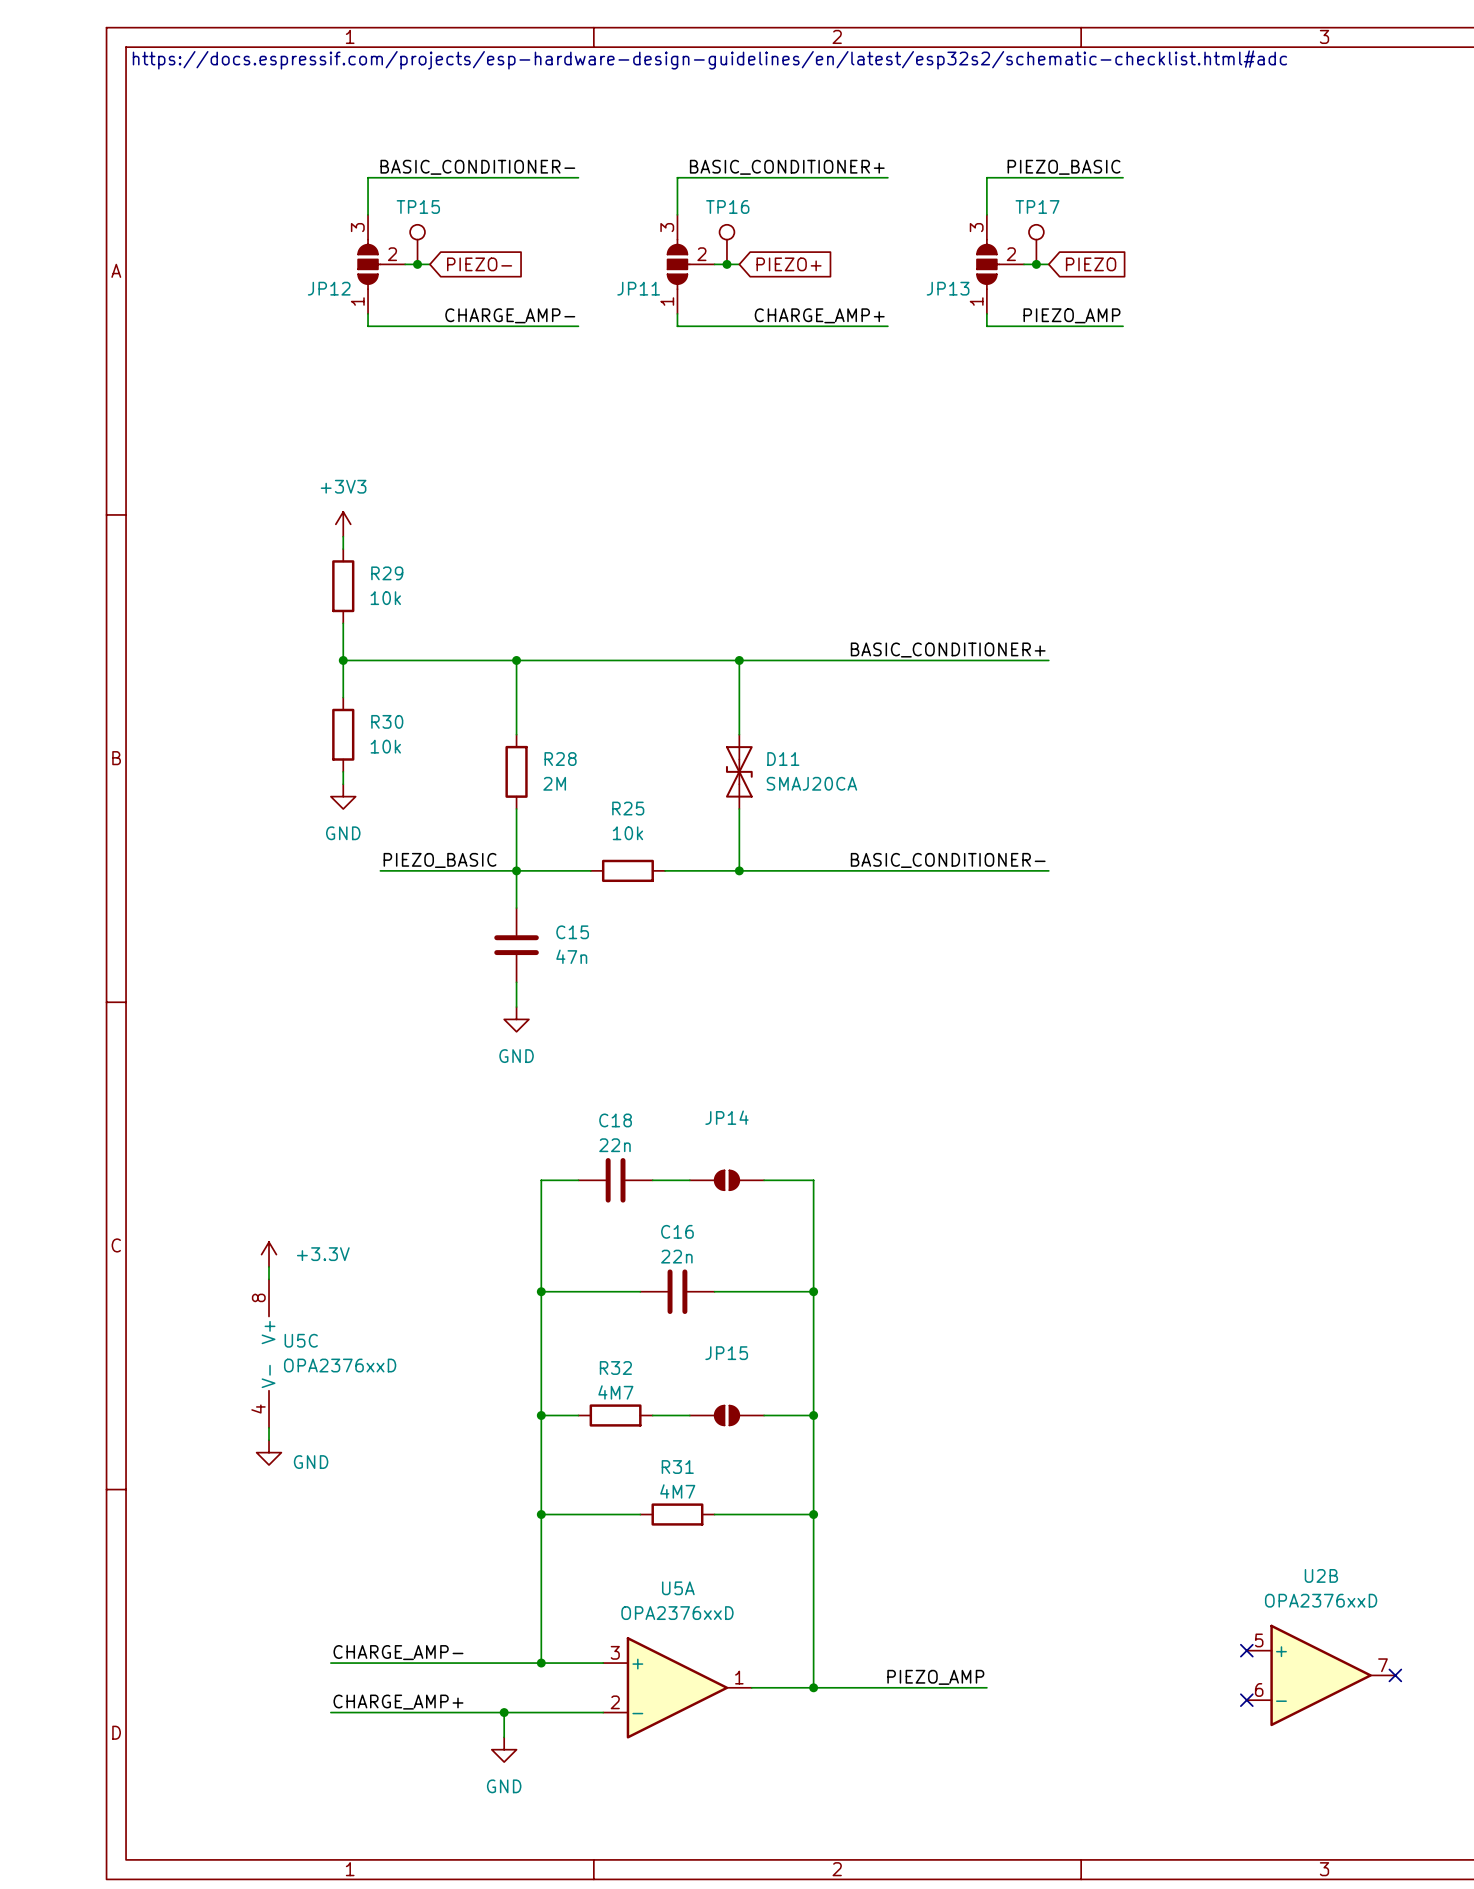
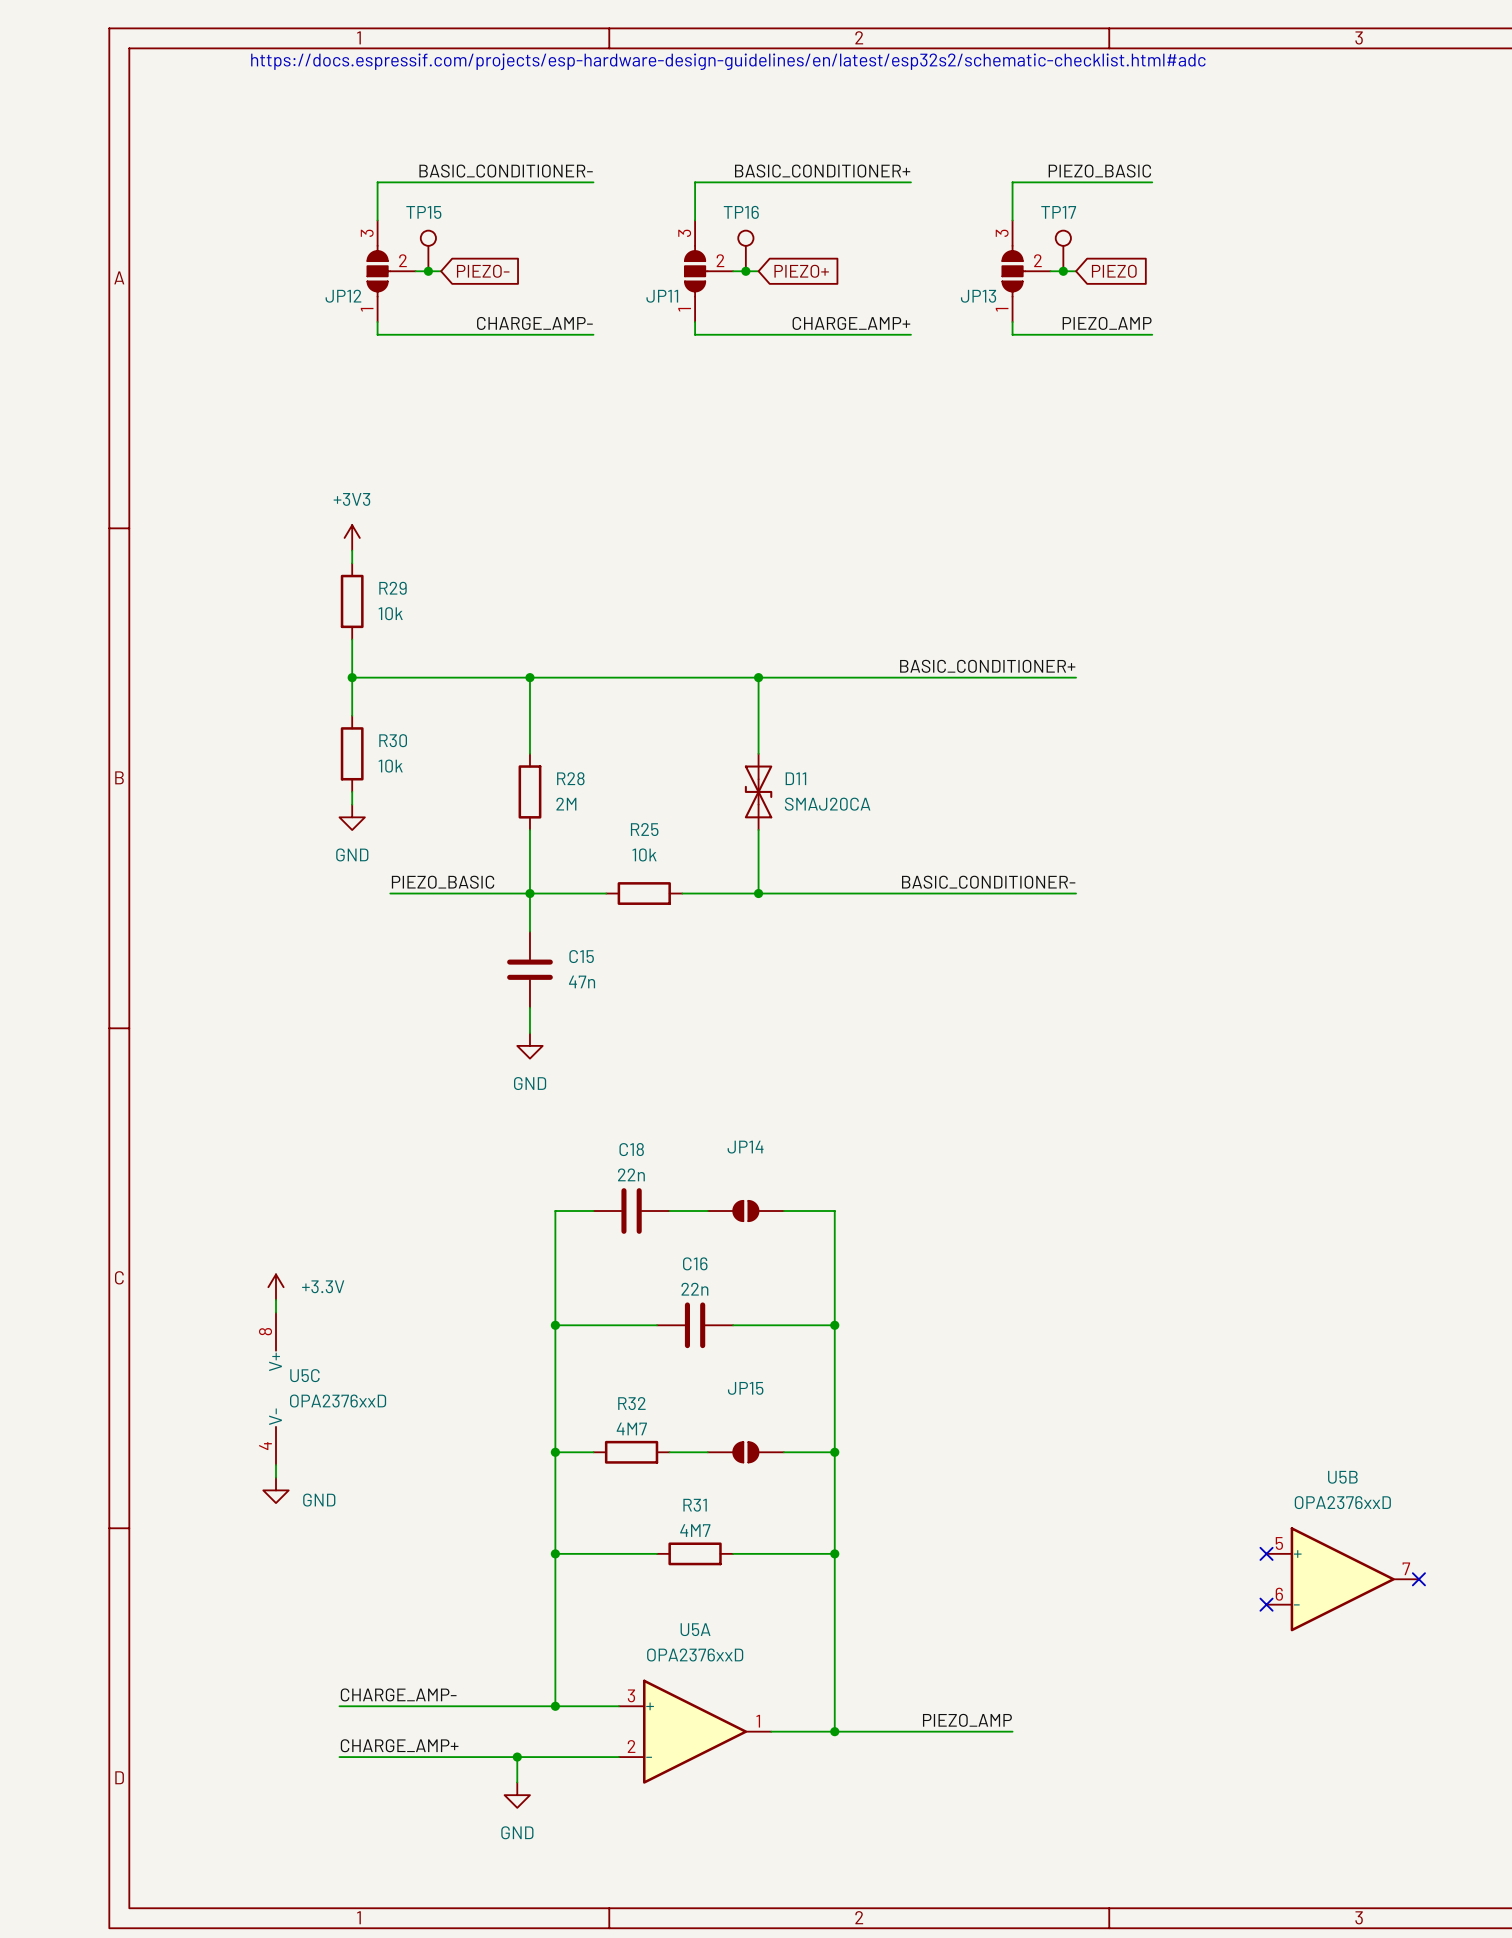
no-connect mark: none -> (1266, 1553)
U5B: none -> OPA2376xxD (1342, 1579)
no-connect mark: none -> (1418, 1579)
no-connect mark: none -> (1266, 1604)
no-connect mark: (1246, 1650) -> none
U2B: OPA2376xxD (1321, 1675) -> none
no-connect mark: (1395, 1675) -> none
no-connect mark: (1246, 1700) -> none

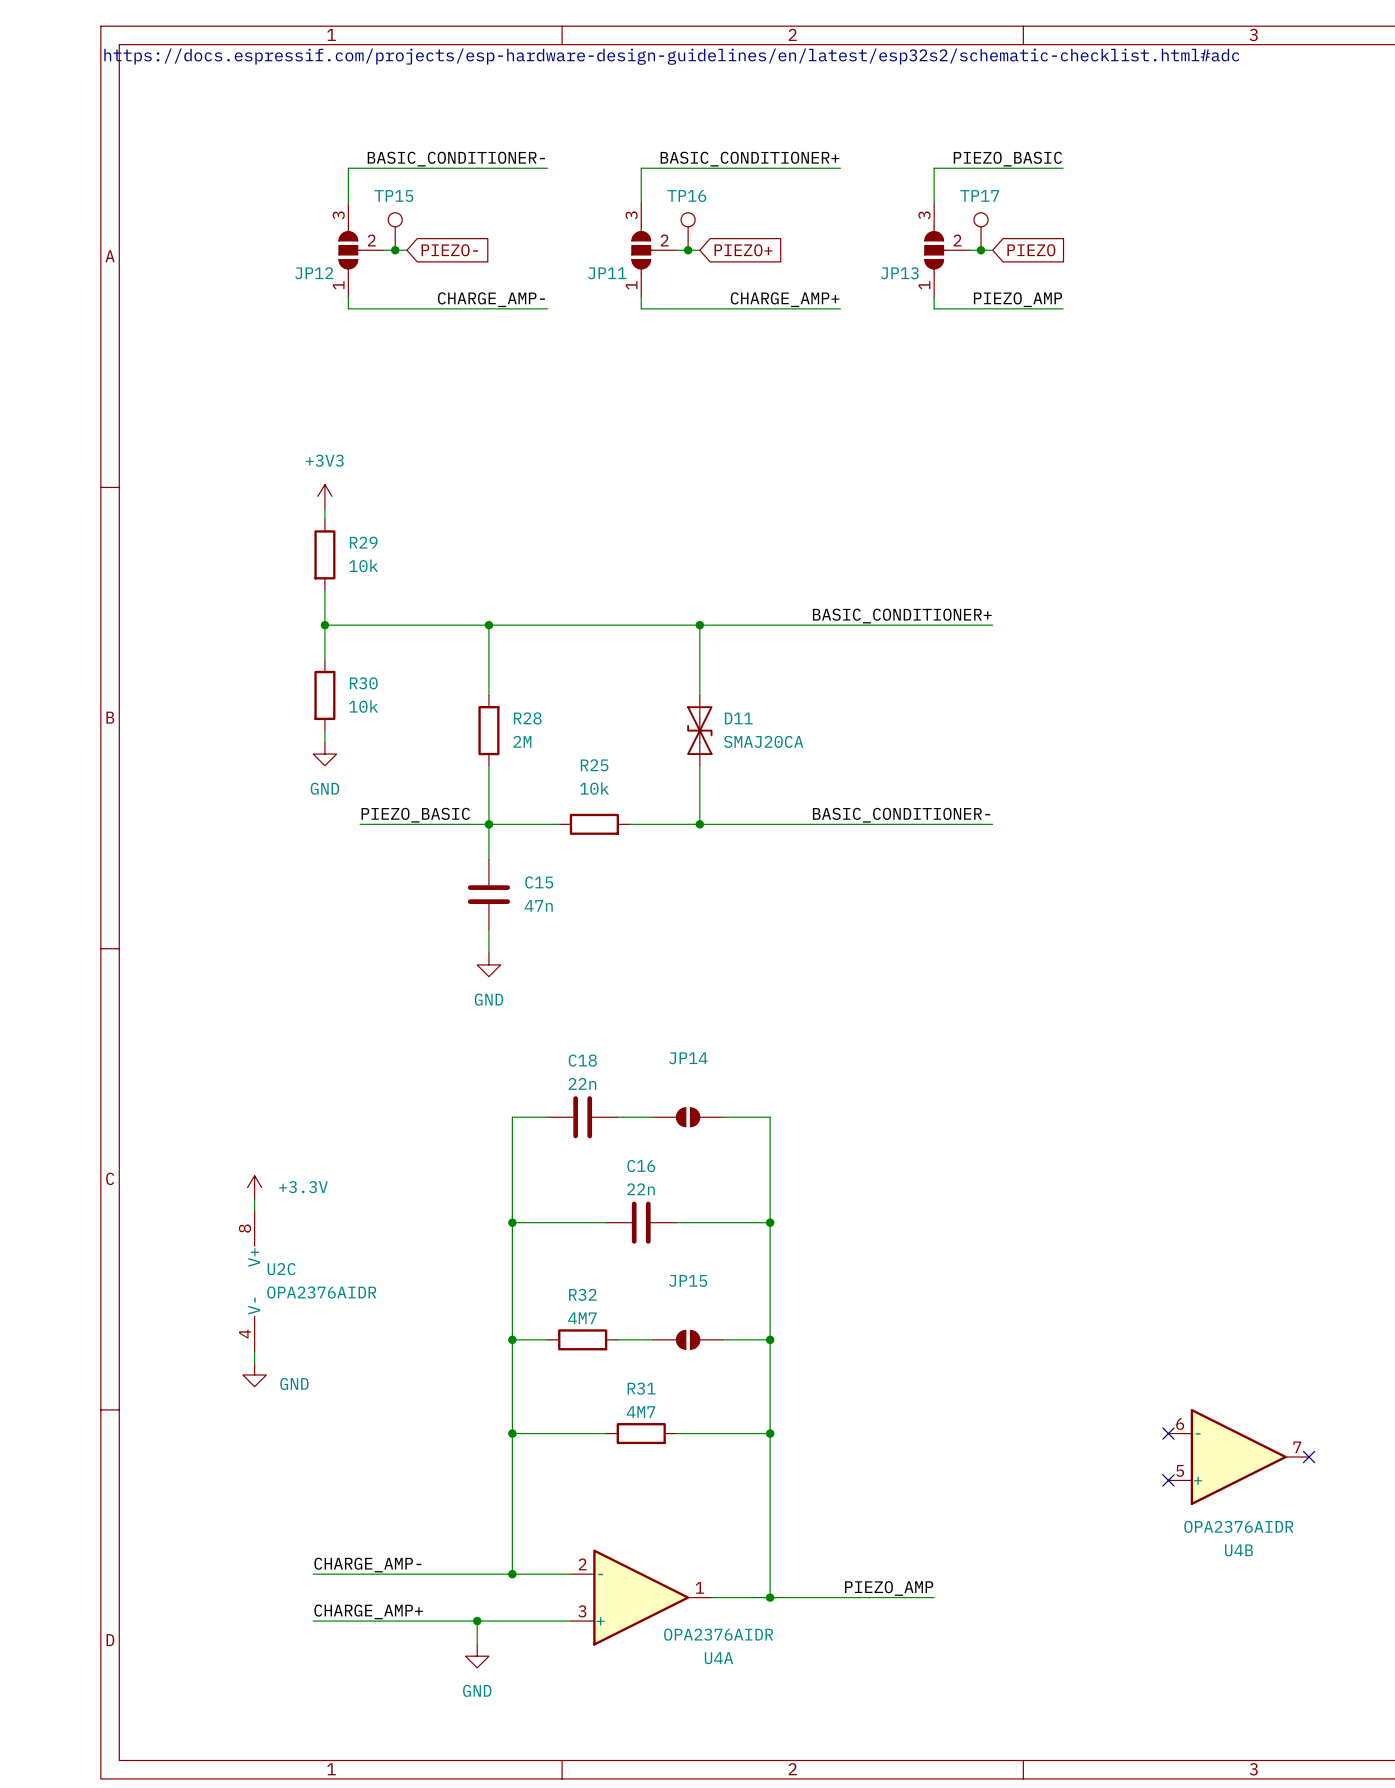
U5C name: U5C (304, 1375) -> U2C (281, 1269)
U5C value: OPA2376xxD (338, 1401) -> OPA2376AIDR (321, 1292)
U5B name: U5B (1342, 1477) -> U4B (1238, 1550)
U5B value: OPA2376xxD (1342, 1502) -> OPA2376AIDR (1238, 1526)
U5B flip: as is (1342, 1579) -> up-down (1238, 1457)
U5A name: U5A (695, 1629) -> U4A (719, 1658)
U5A value: OPA2376xxD (695, 1655) -> OPA2376AIDR (718, 1634)
U5A flip: as is (695, 1731) -> up-down (641, 1597)

